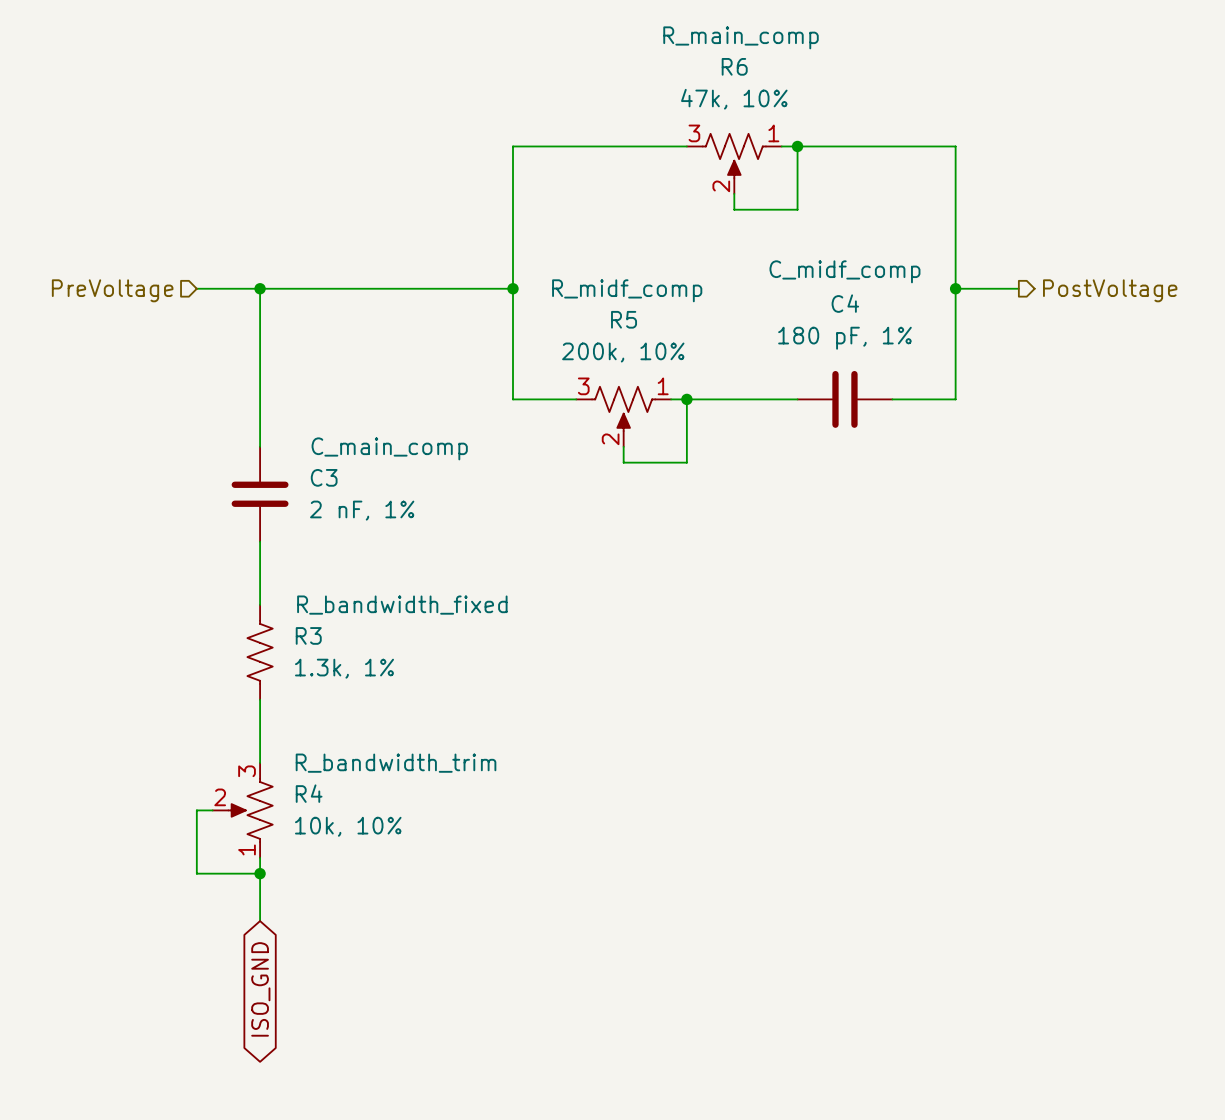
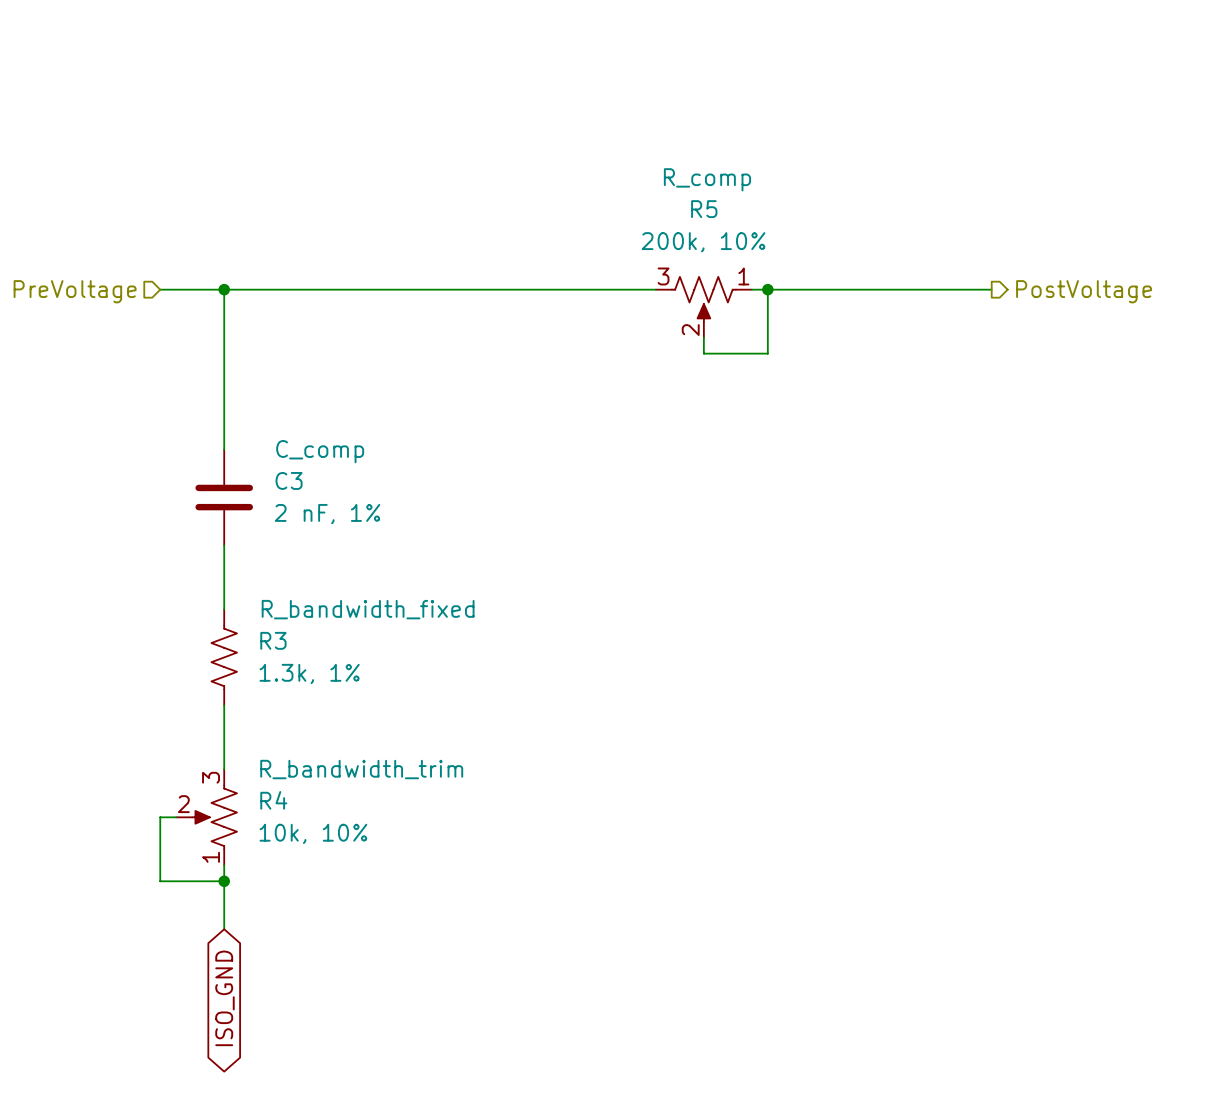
wire: (686, 146) (513, 146) (513, 399) (576, 399) -> none
wire: (781, 146) (955, 146) (955, 399) (892, 399) -> none
wire: (797, 146) (797, 209) (734, 209) (734, 193) -> (767, 289) (767, 353) (703, 353) (703, 337)
junction: (797, 146) -> none
R6: 47k, 10% (734, 163) -> none
wire: none -> (480, 289) (655, 289)
junction: (513, 288) -> none
wire: none -> (751, 289) (927, 289)
junction: none -> (767, 289)
junction: (955, 288) -> none
R5 text: R_midf_comp (627, 290) -> R_comp (707, 179)
wire: (671, 399) (797, 399) -> none
wire: (686, 399) (686, 462) (623, 462) (623, 446) -> none
junction: (686, 399) -> none
C4: 180 pF, 1% (844, 399) -> none
R5 position: (623, 416) -> (703, 307)
C3 text: C_main_comp (389, 448) -> C_comp (320, 451)

